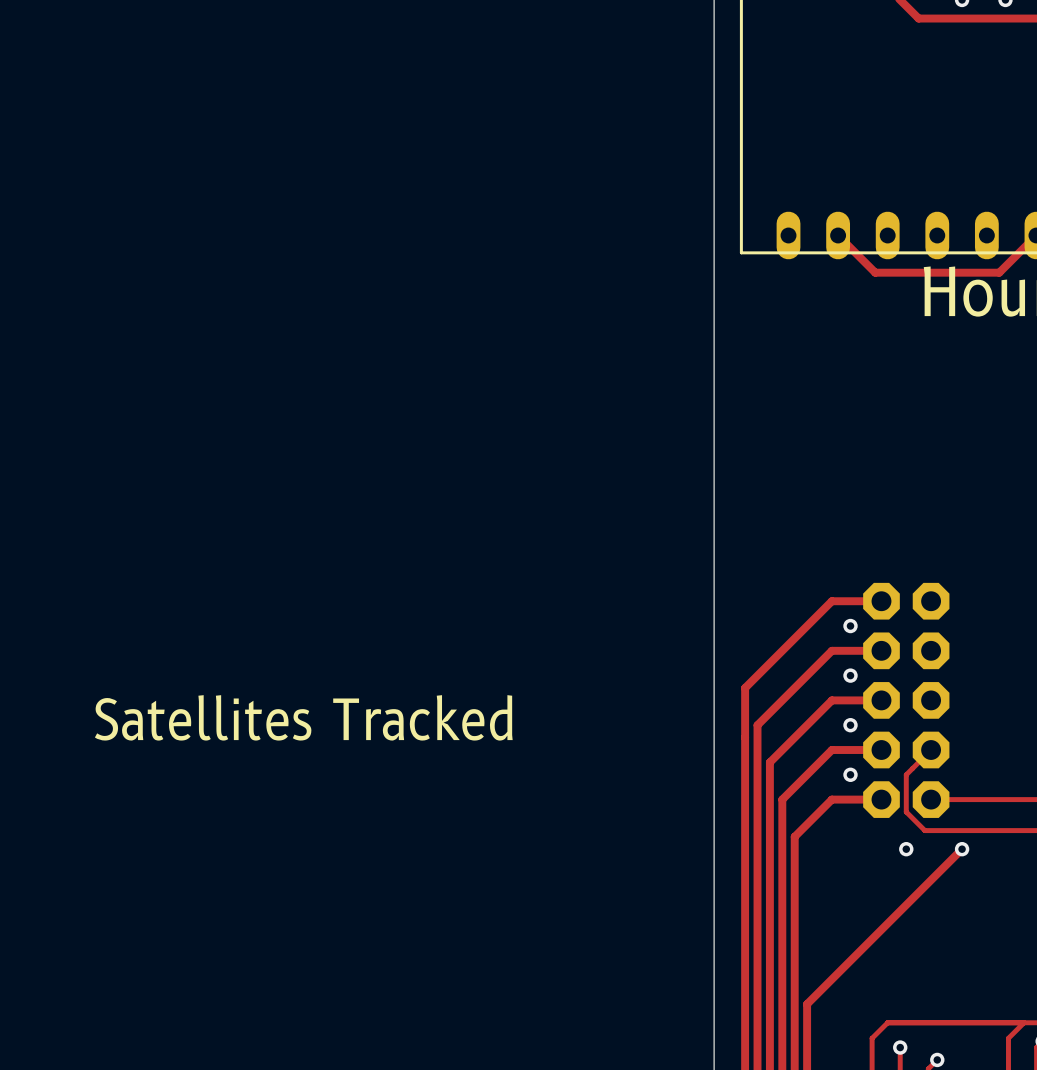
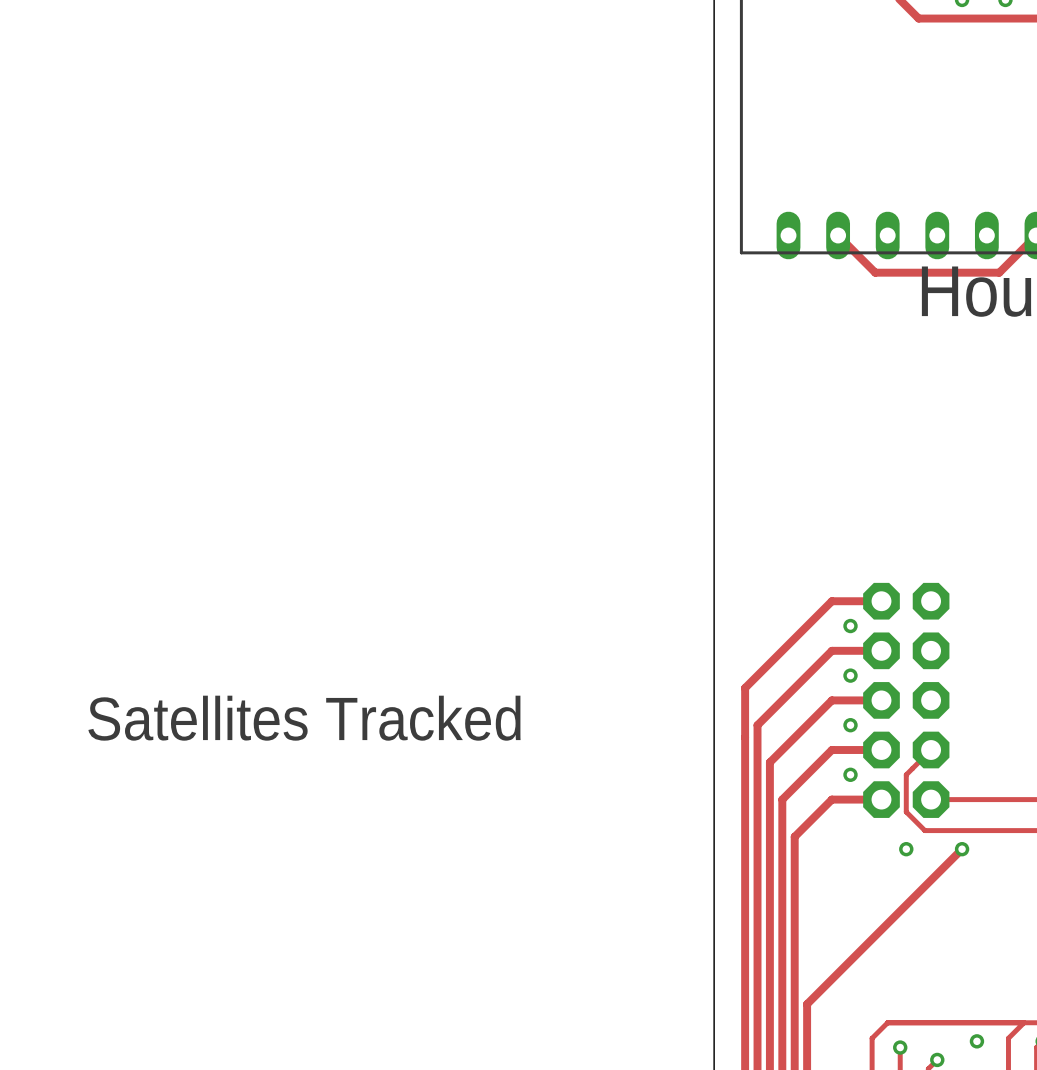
via: none -> (976, 1041)

